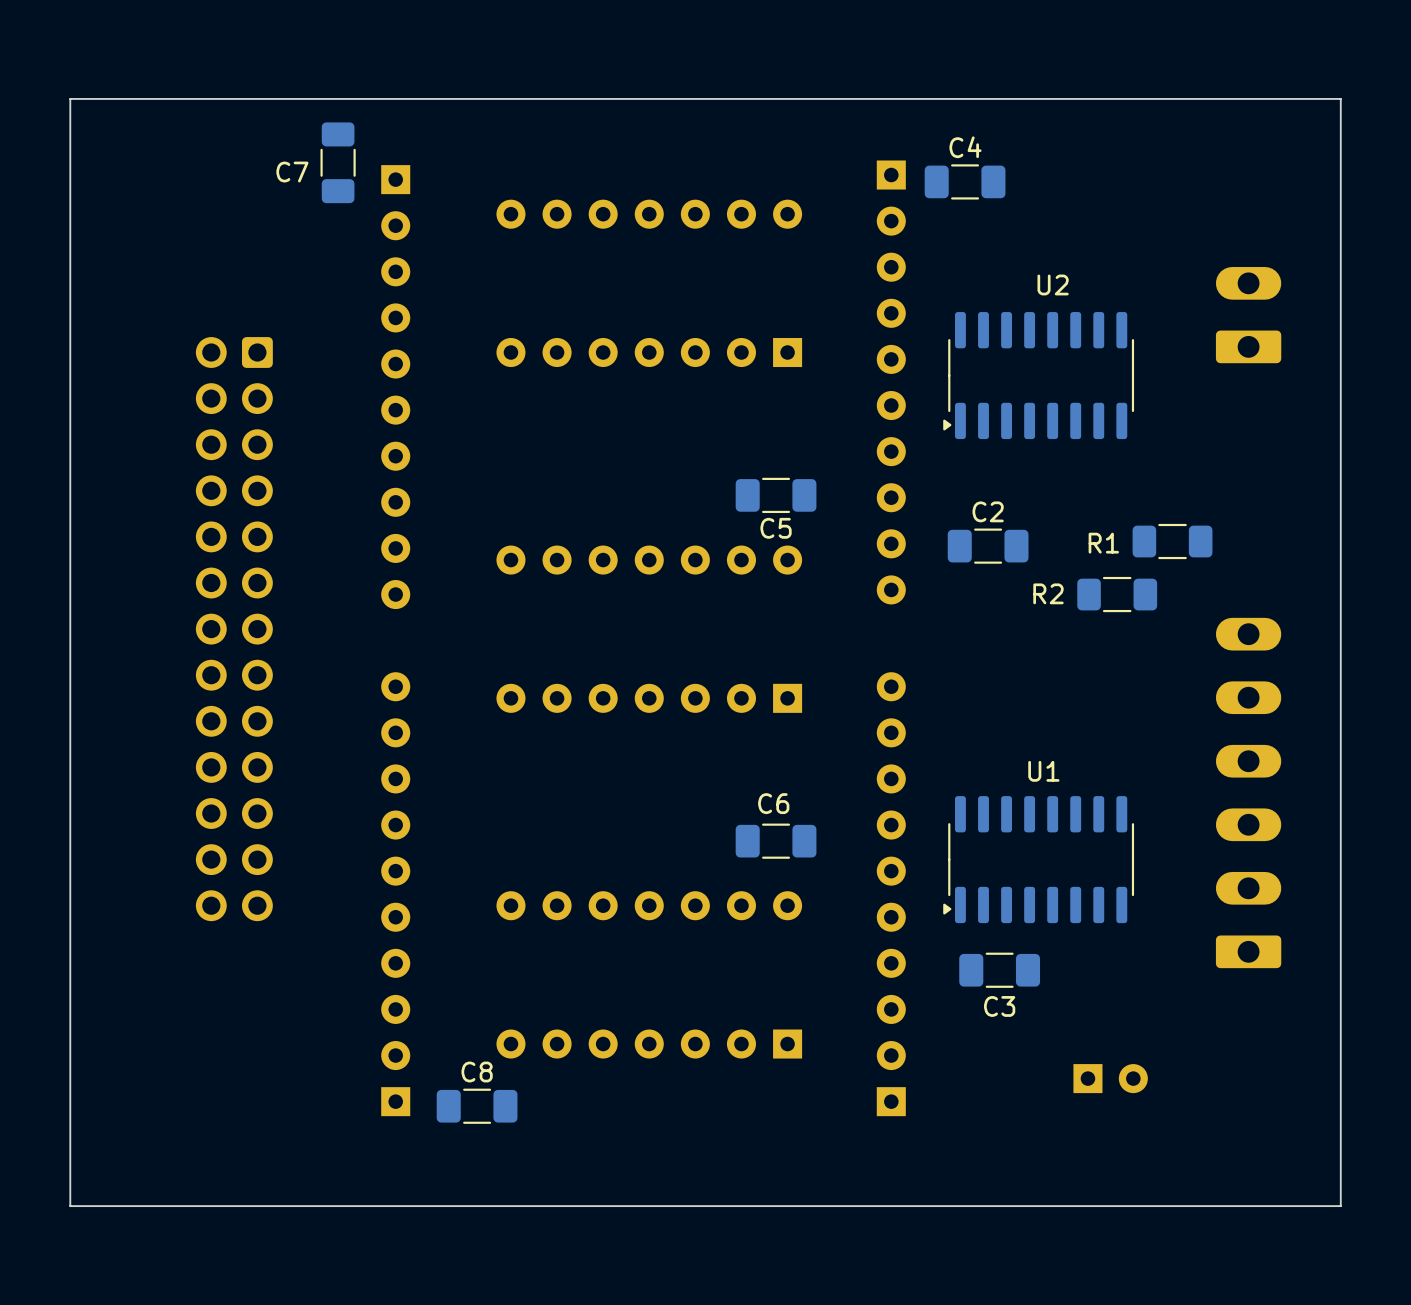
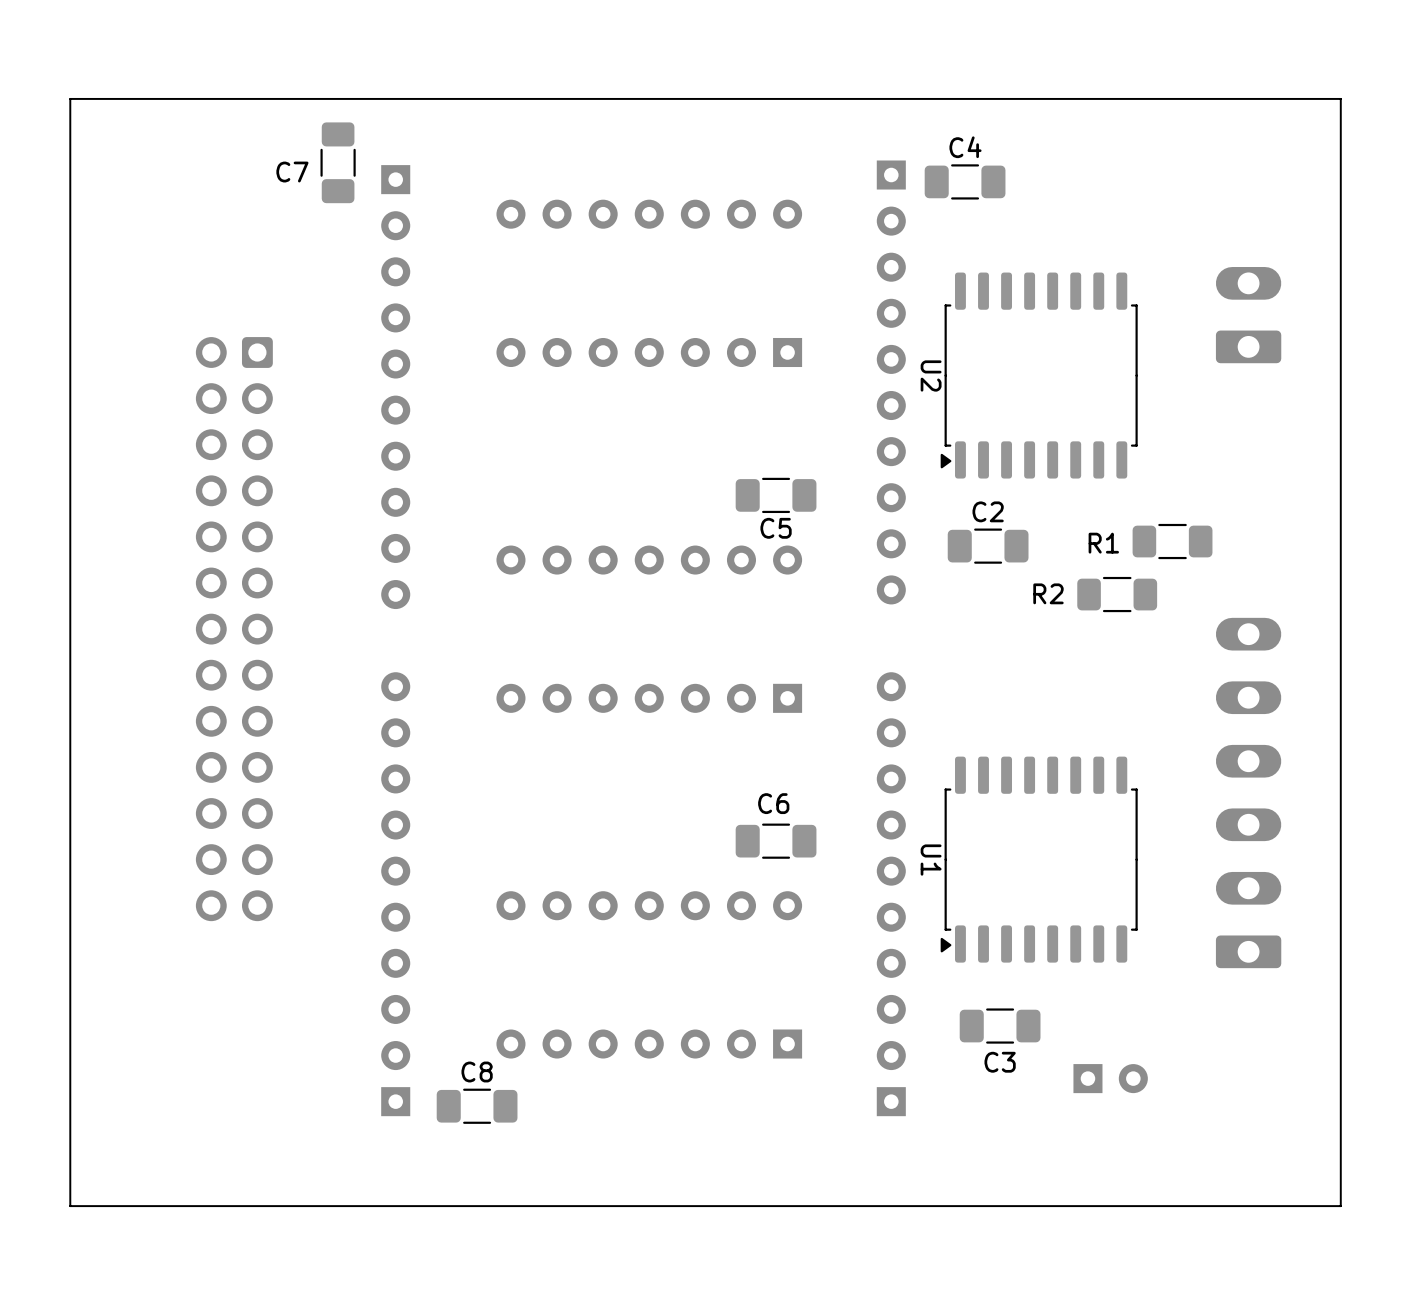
U2 name position: U2 (1053, 284) -> U2 (931, 375)
U2 footprint: [943, 312, 1135, 440] -> [940, 272, 1138, 479]
U1 name position: U1 (1043, 771) -> U1 (931, 860)
U1 footprint: [943, 796, 1135, 924] -> [940, 756, 1138, 963]
C3 position: (999, 970) -> (1000, 1026)

